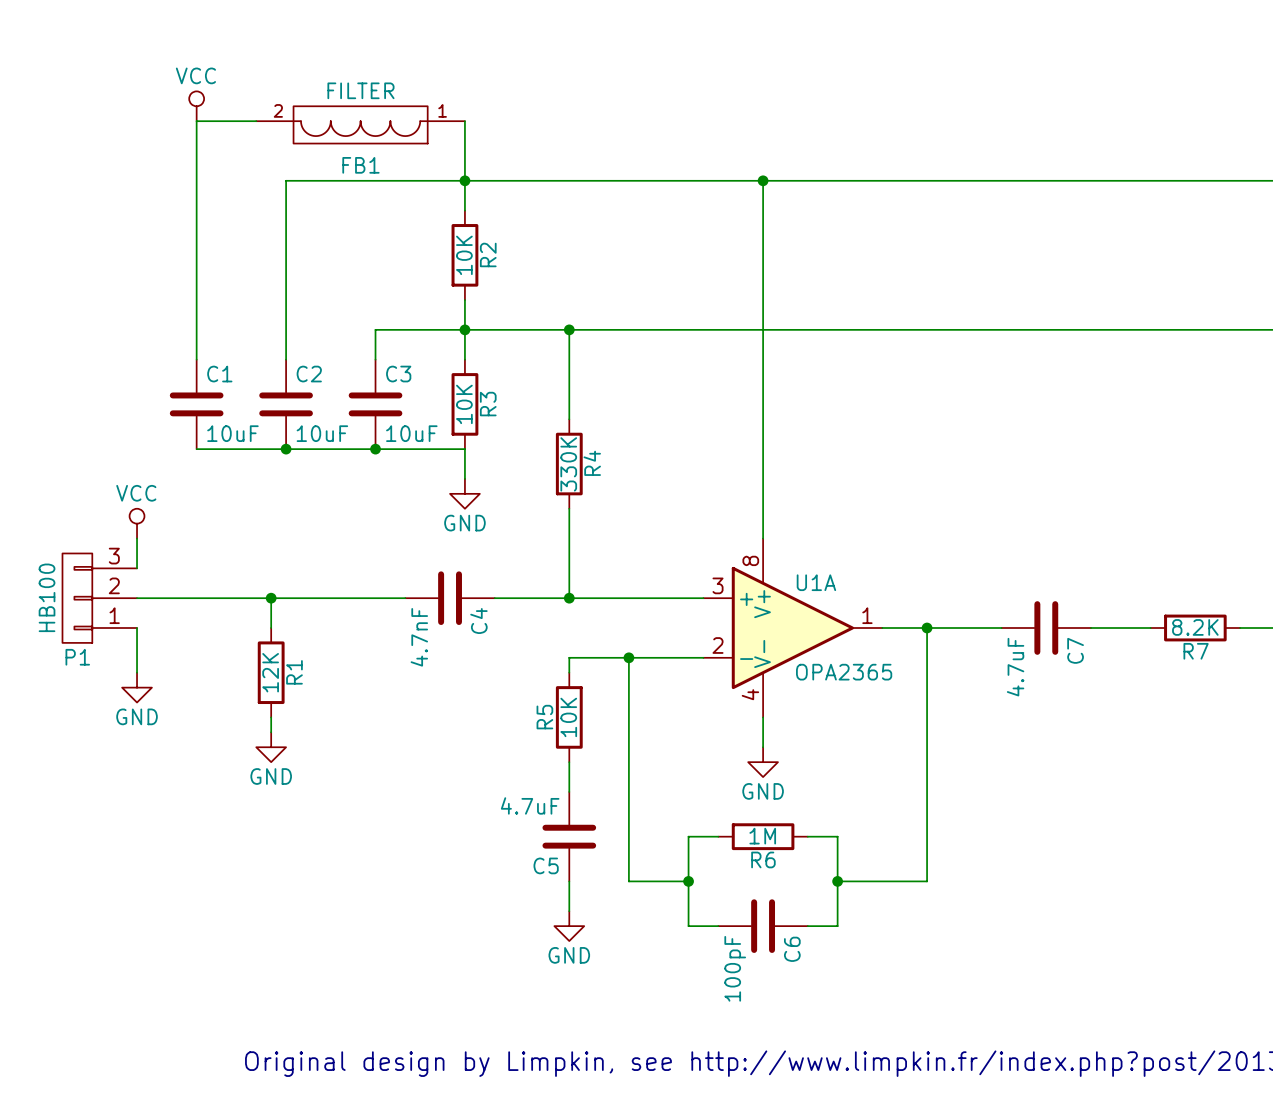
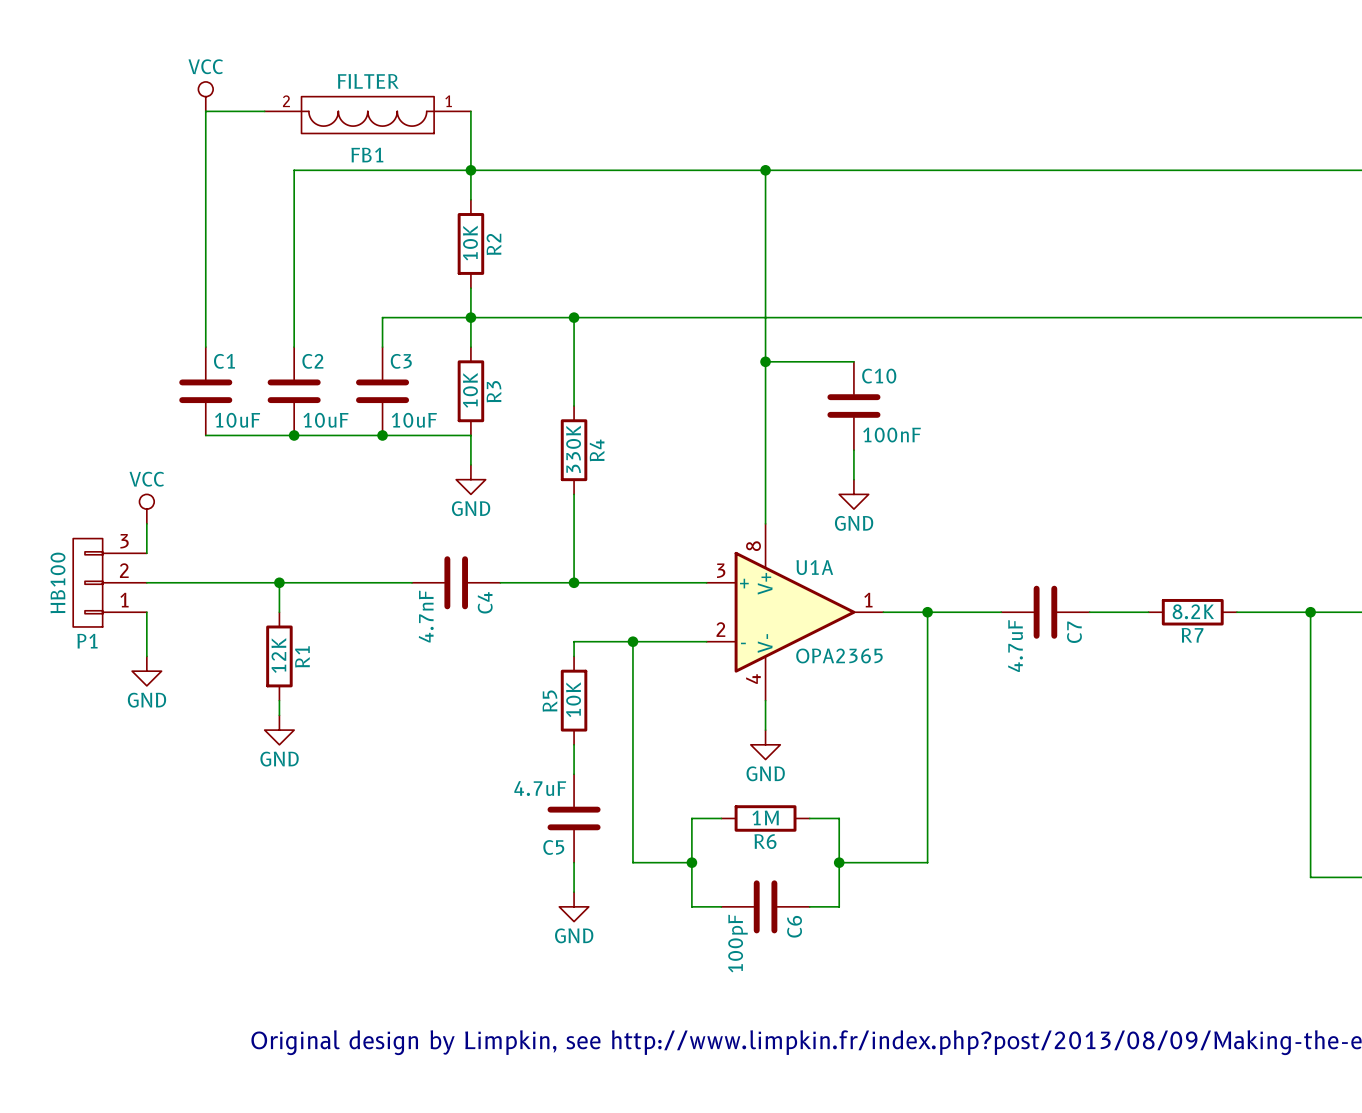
wire: none -> (765, 361) (853, 361)
junction: none -> (765, 361)
C10: none -> 100nF (853, 406)
wire: none -> (853, 450) (853, 479)
power symbol: none -> GND (853, 494)

